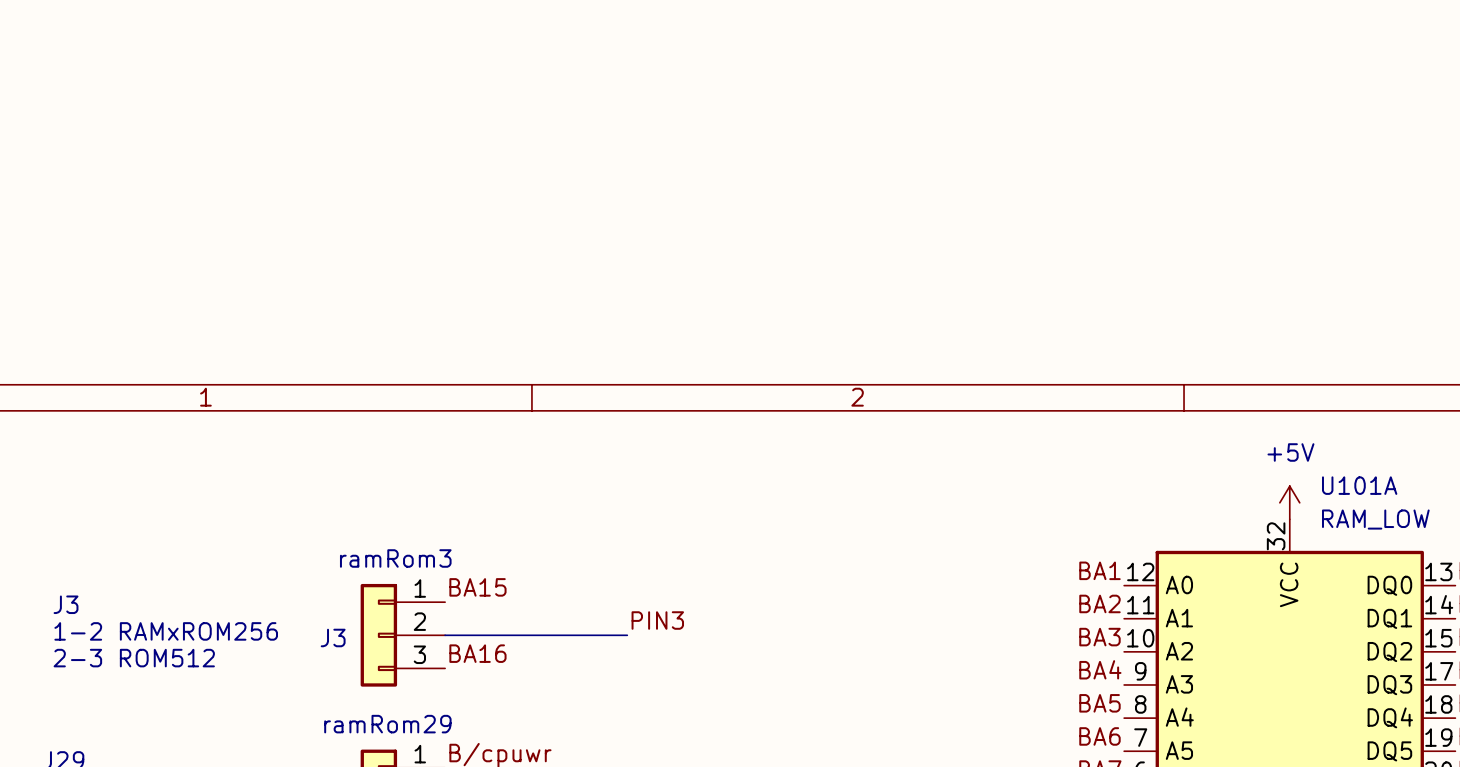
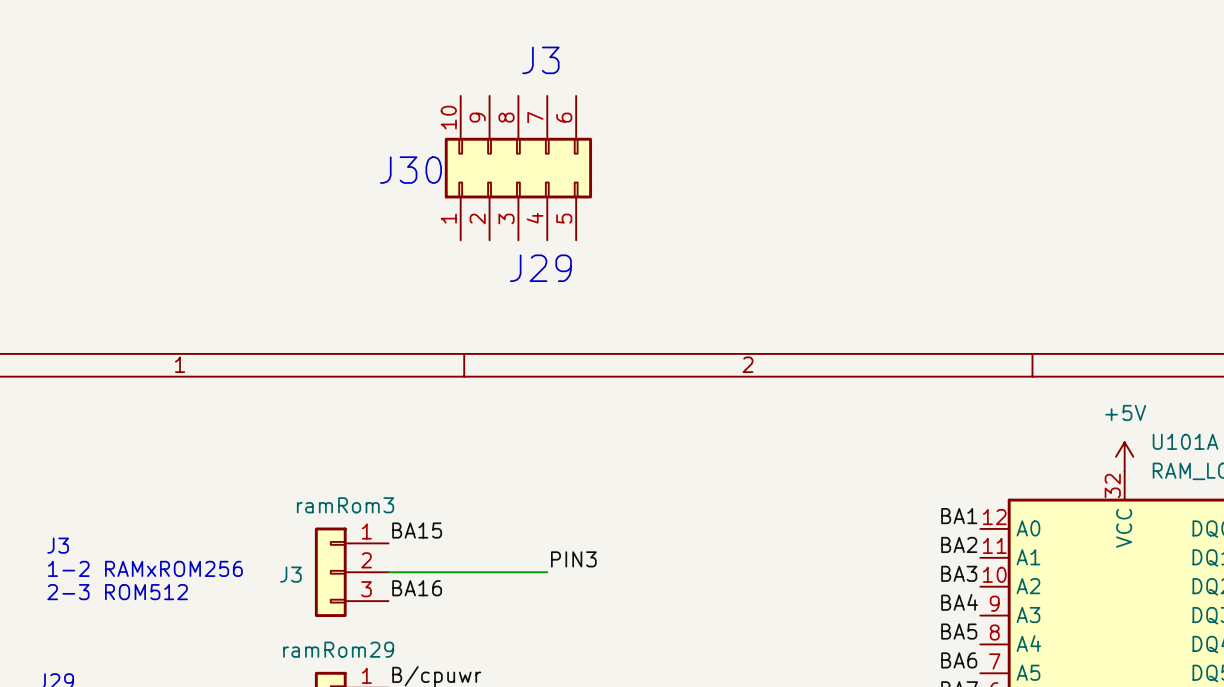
text: none -> J3 (540, 60)
part: none -> (518, 168)
text: none -> J30 (410, 170)
text: none -> J29 (540, 268)

